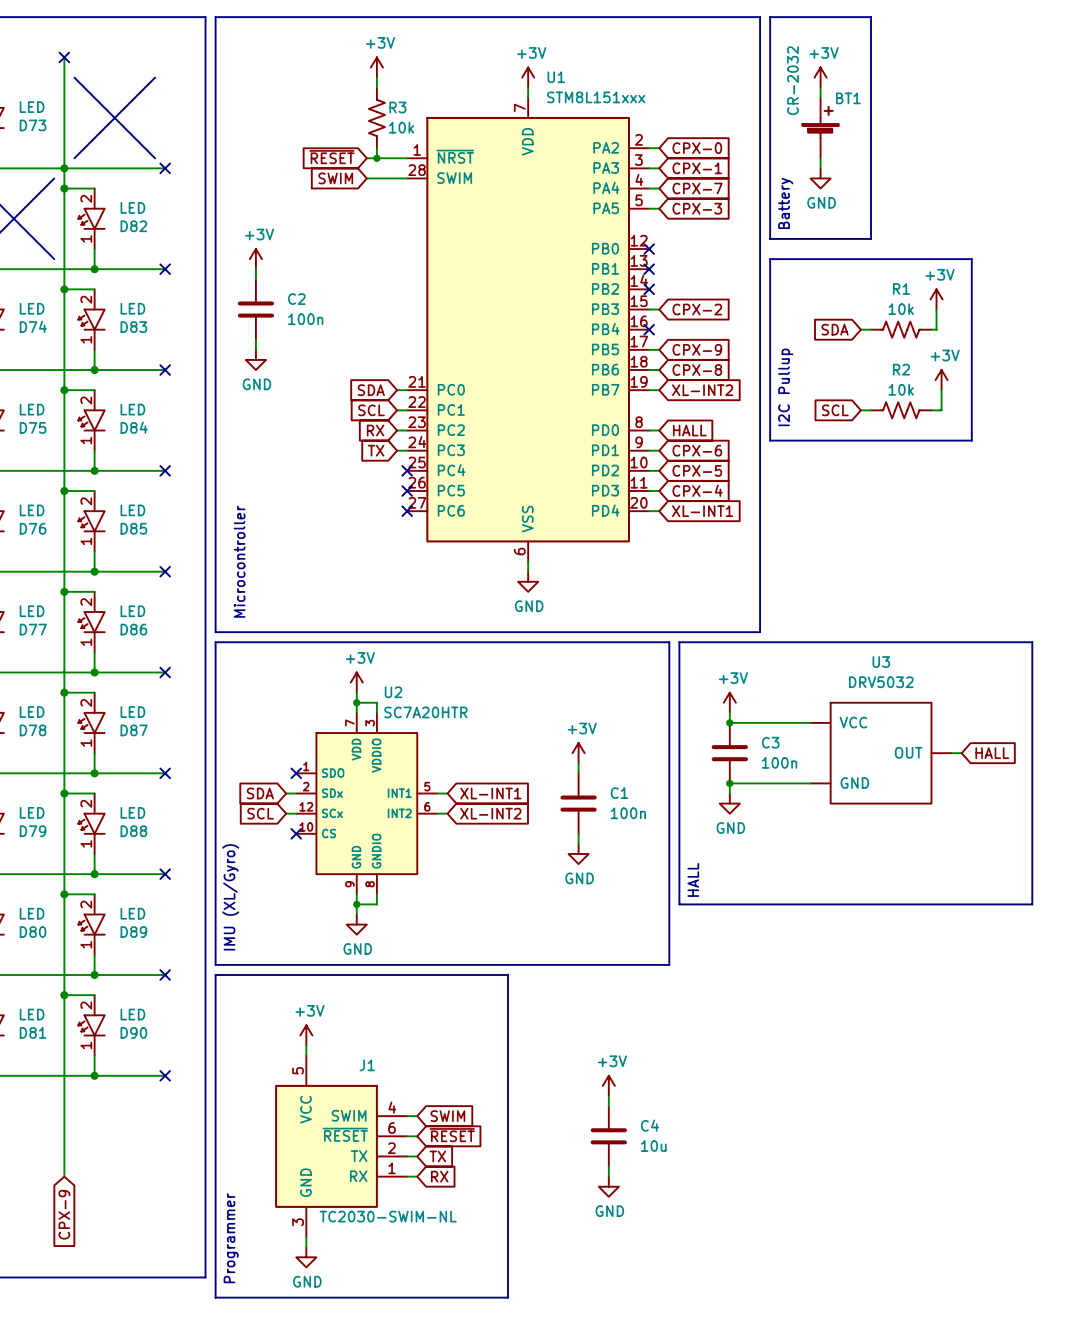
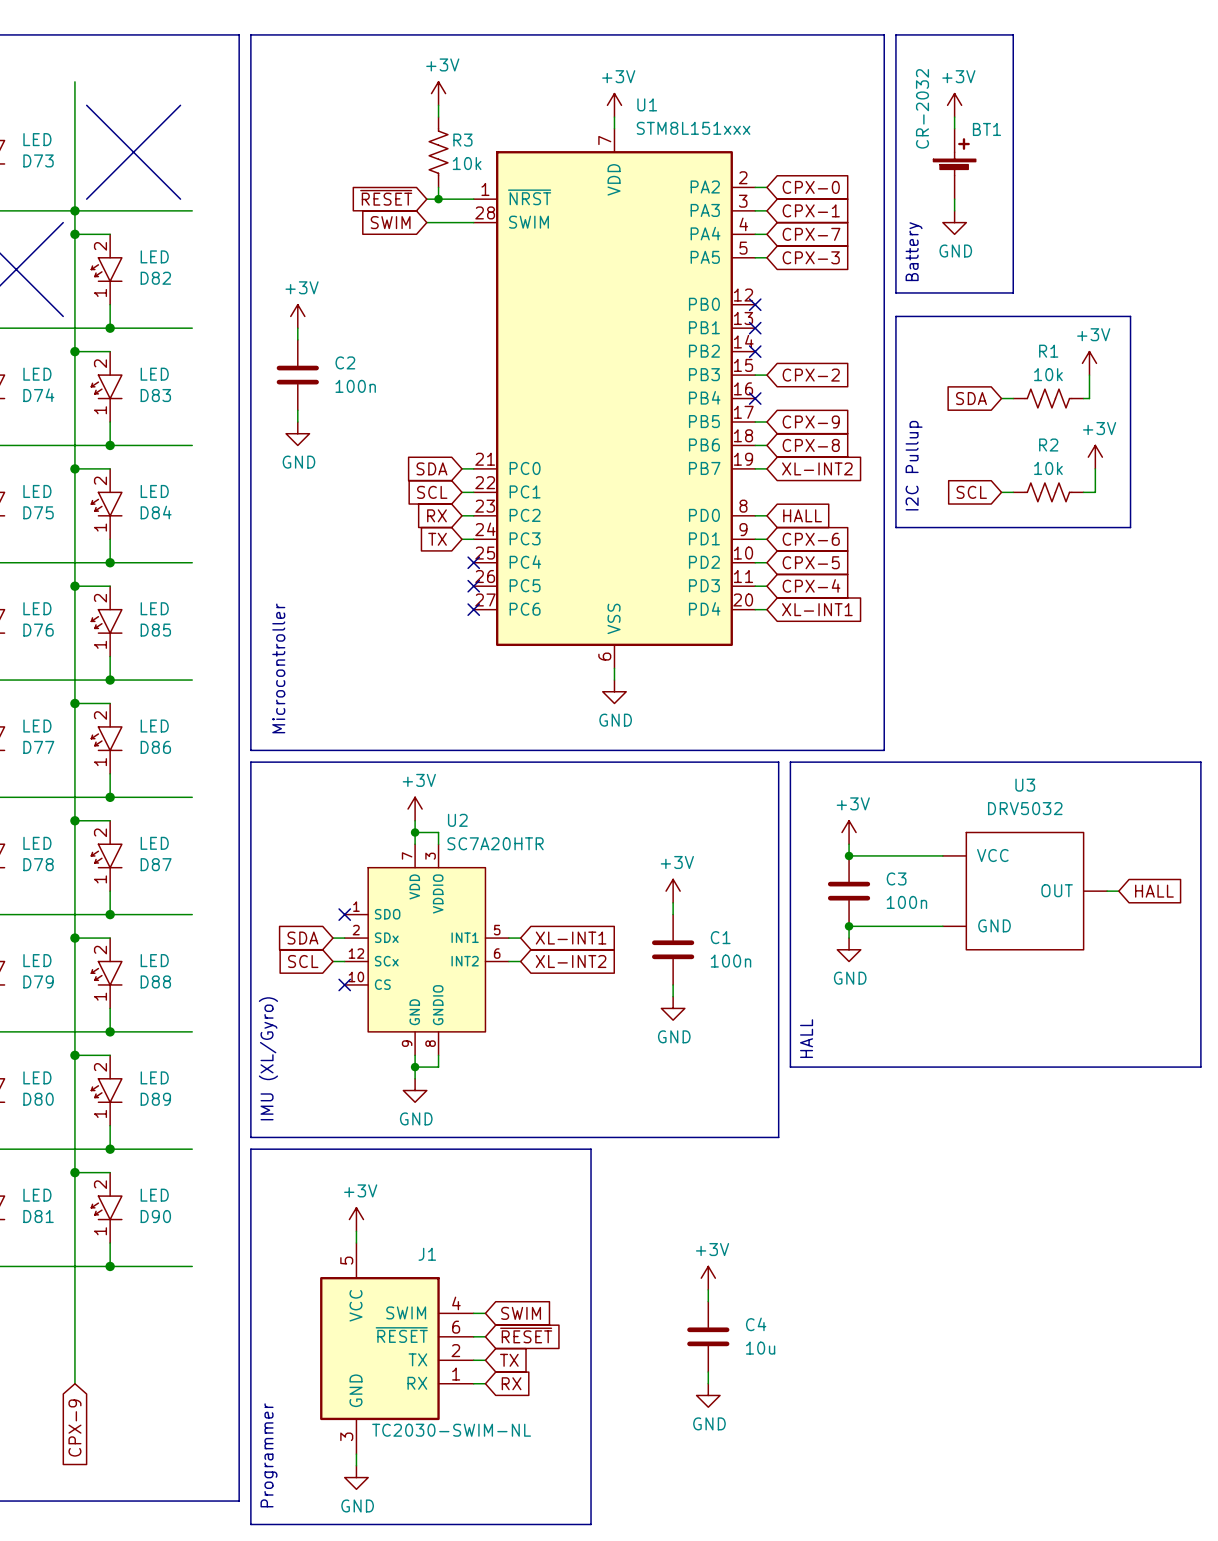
no-connect mark: (64, 57) -> none
no-connect mark: (165, 168) -> none
no-connect mark: (165, 269) -> none
no-connect mark: (165, 370) -> none
no-connect mark: (165, 470) -> none
no-connect mark: (165, 571) -> none
no-connect mark: (165, 672) -> none
no-connect mark: (165, 773) -> none
no-connect mark: (165, 874) -> none
no-connect mark: (165, 974) -> none
no-connect mark: (165, 1075) -> none

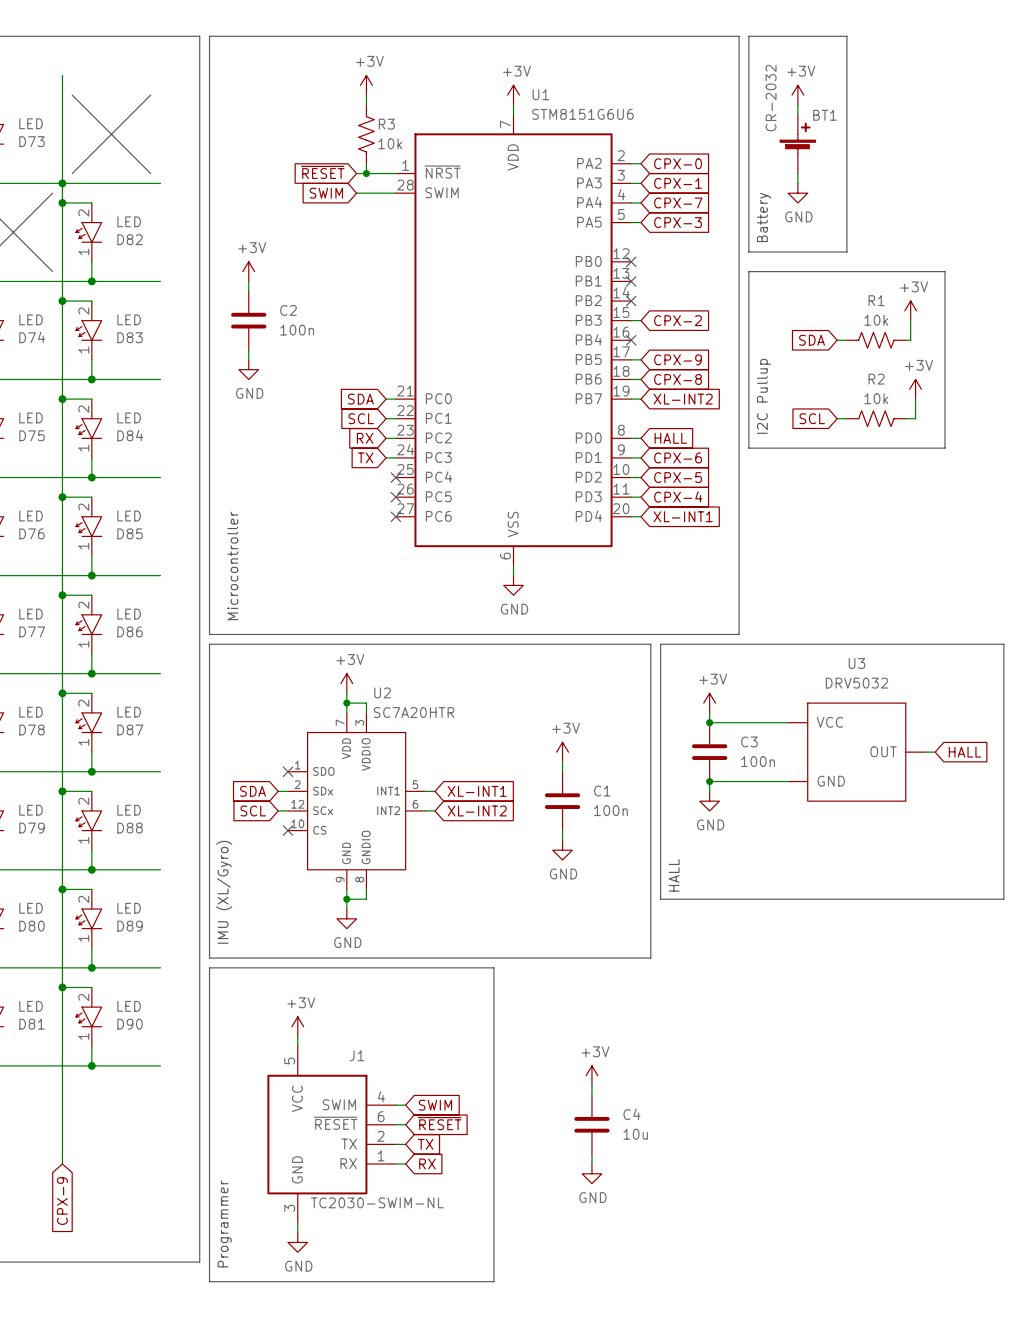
U1 value: STM8L151xxx (693, 128) -> STM8151G6U6 (582, 114)

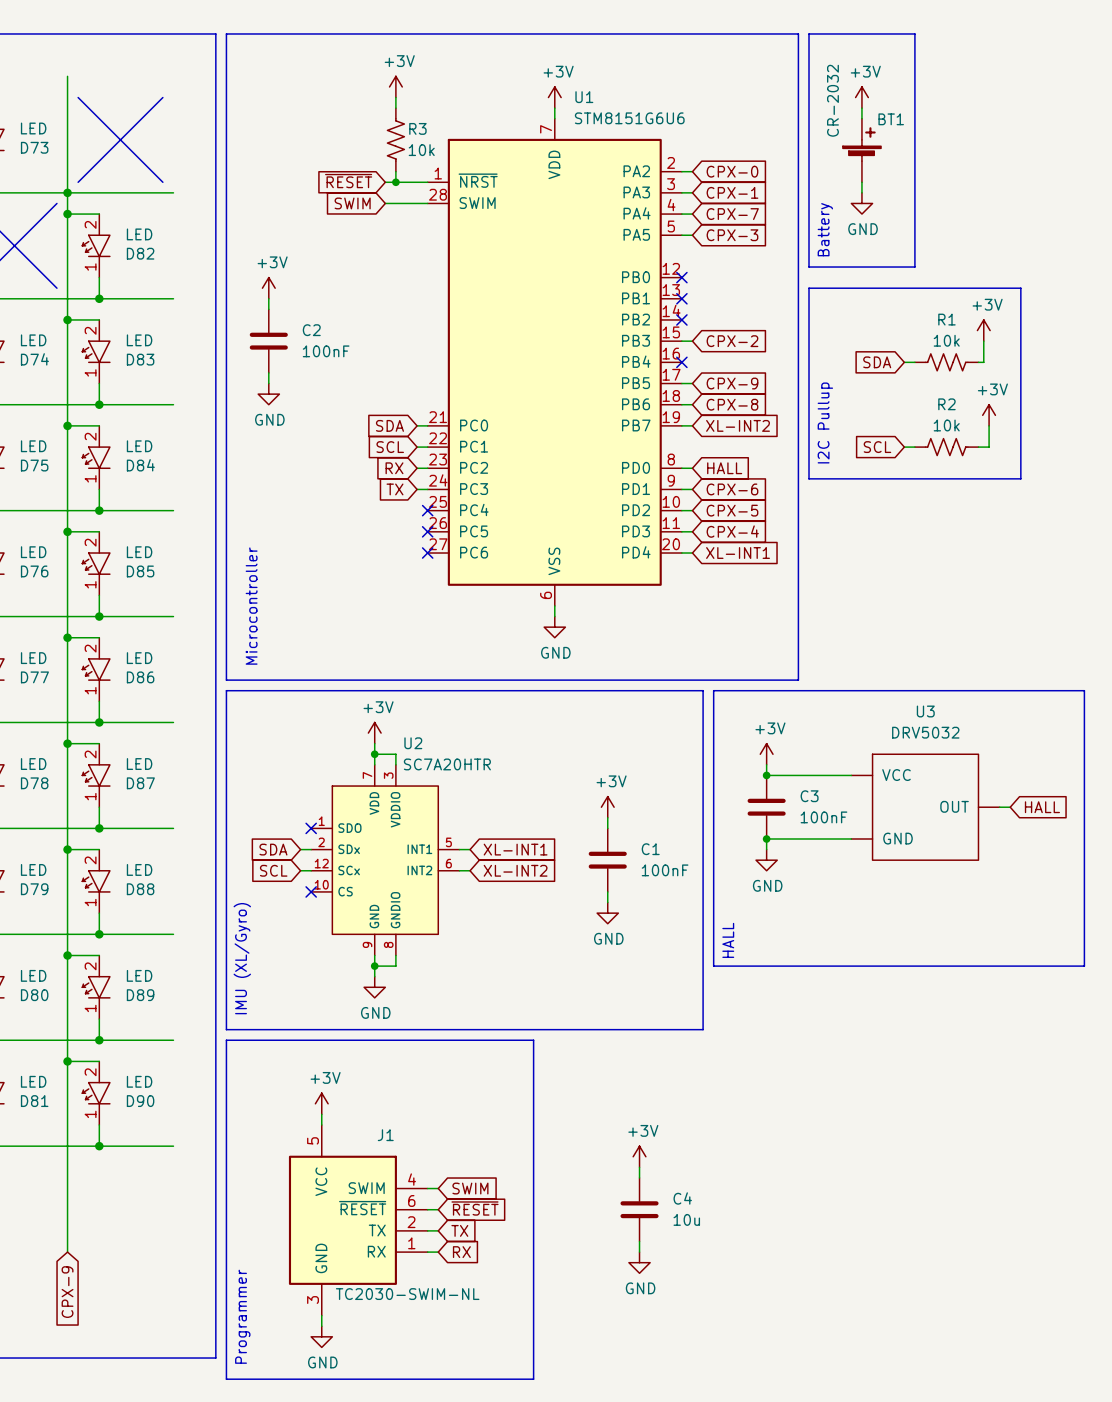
C2 value: 100n (297, 330) -> 100nF (326, 351)
C3 value: 100n (758, 761) -> 100nF (823, 817)
C1 value: 100n (610, 810) -> 100nF (665, 870)

